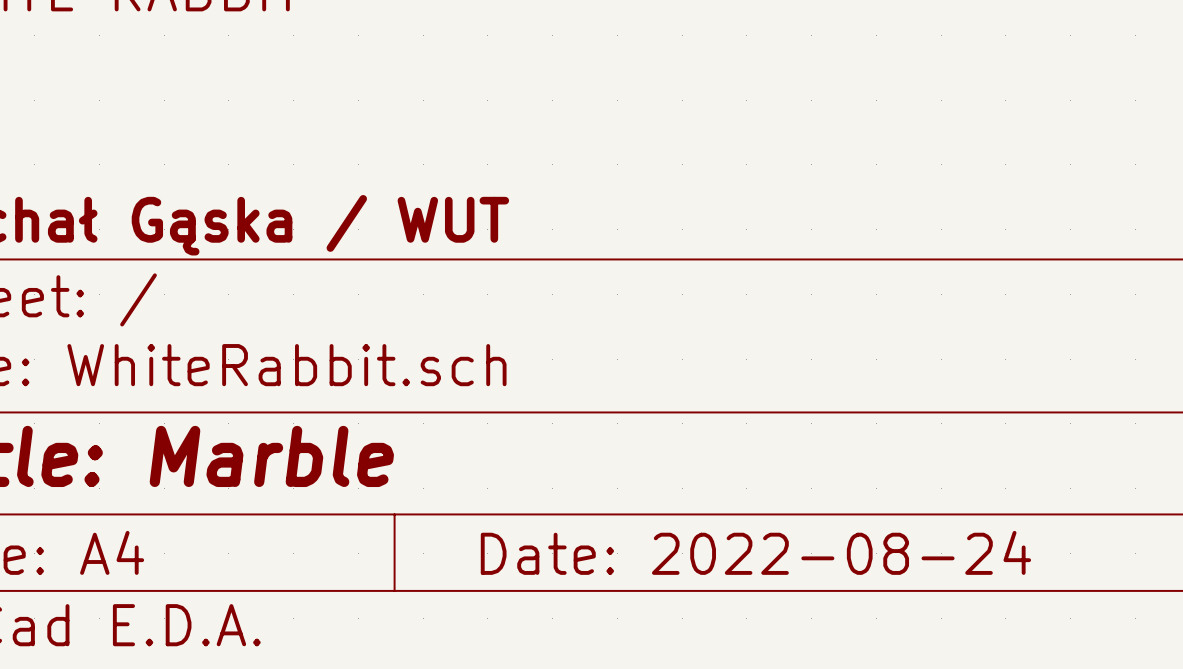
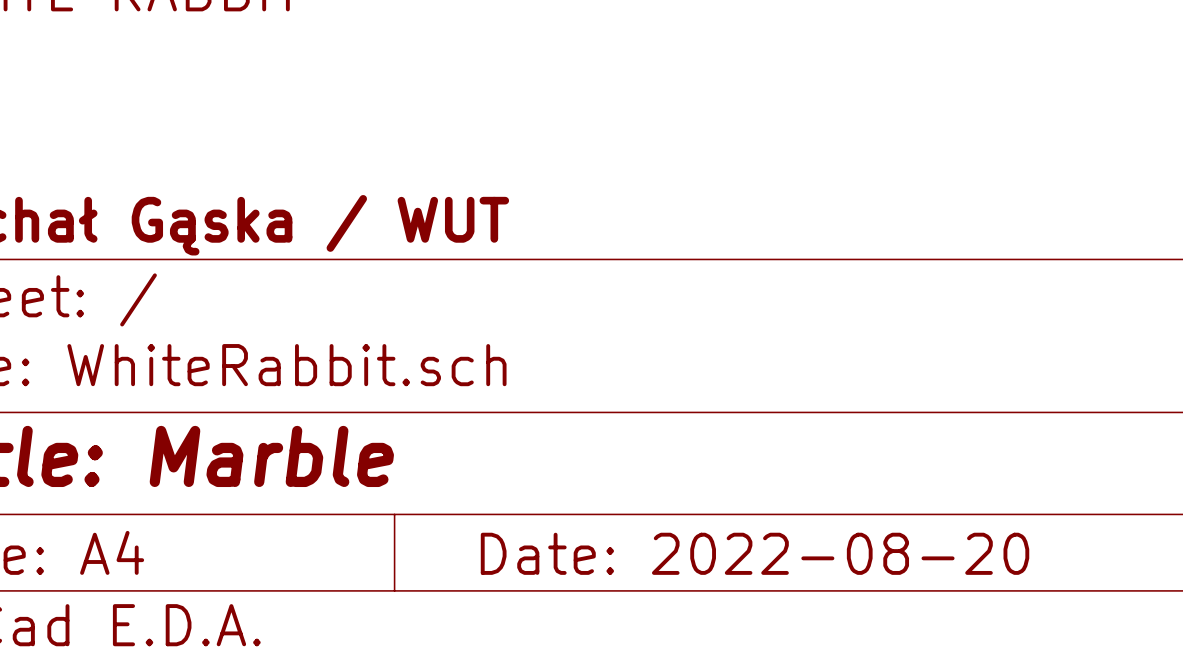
title block: Date: 2022-08-24 (755, 552) -> Date: 2022-08-20 (755, 553)

